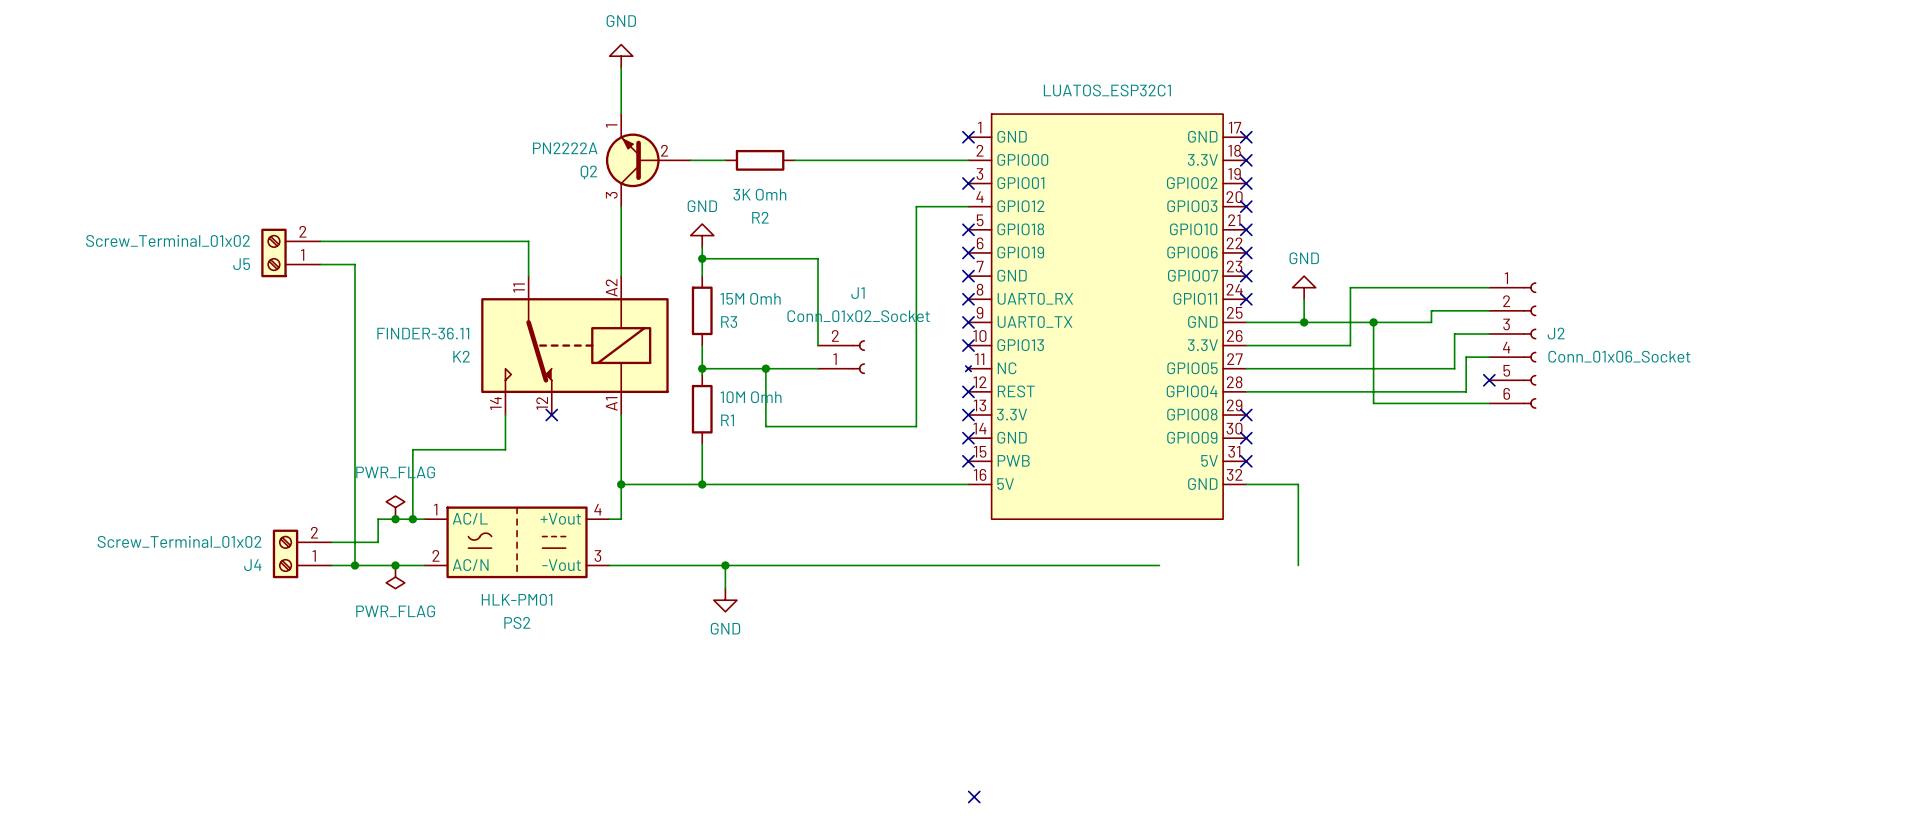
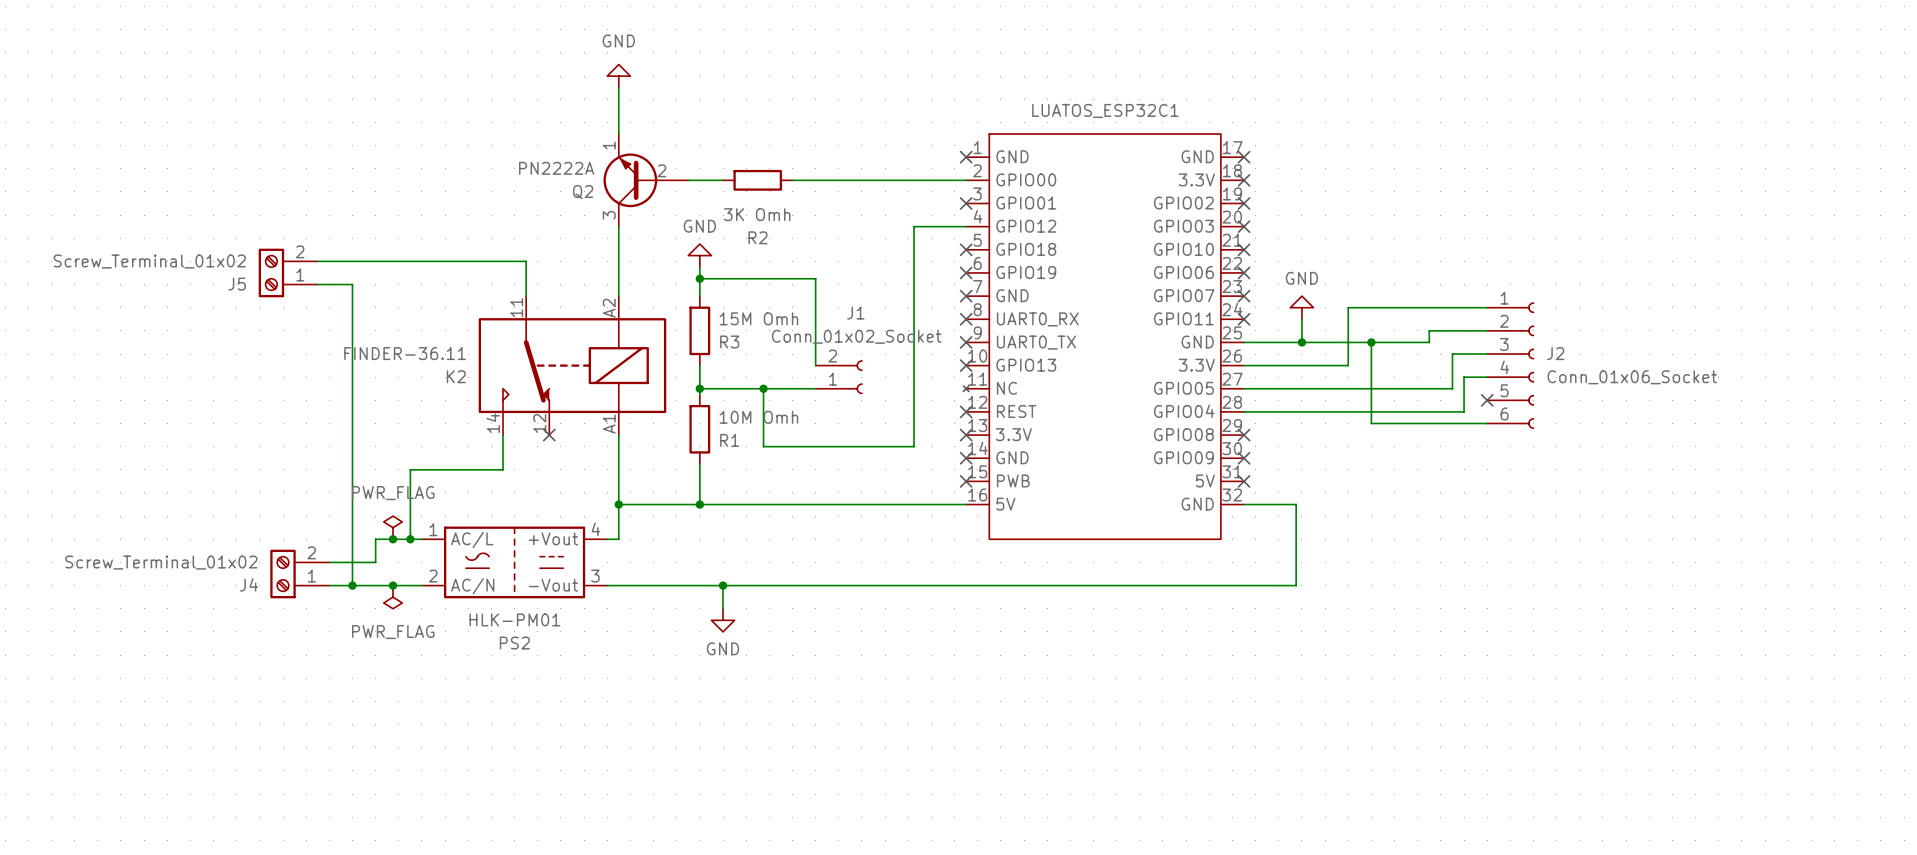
wire: none -> (1157, 585) (1296, 585)
no-connect mark: (974, 796) -> none

